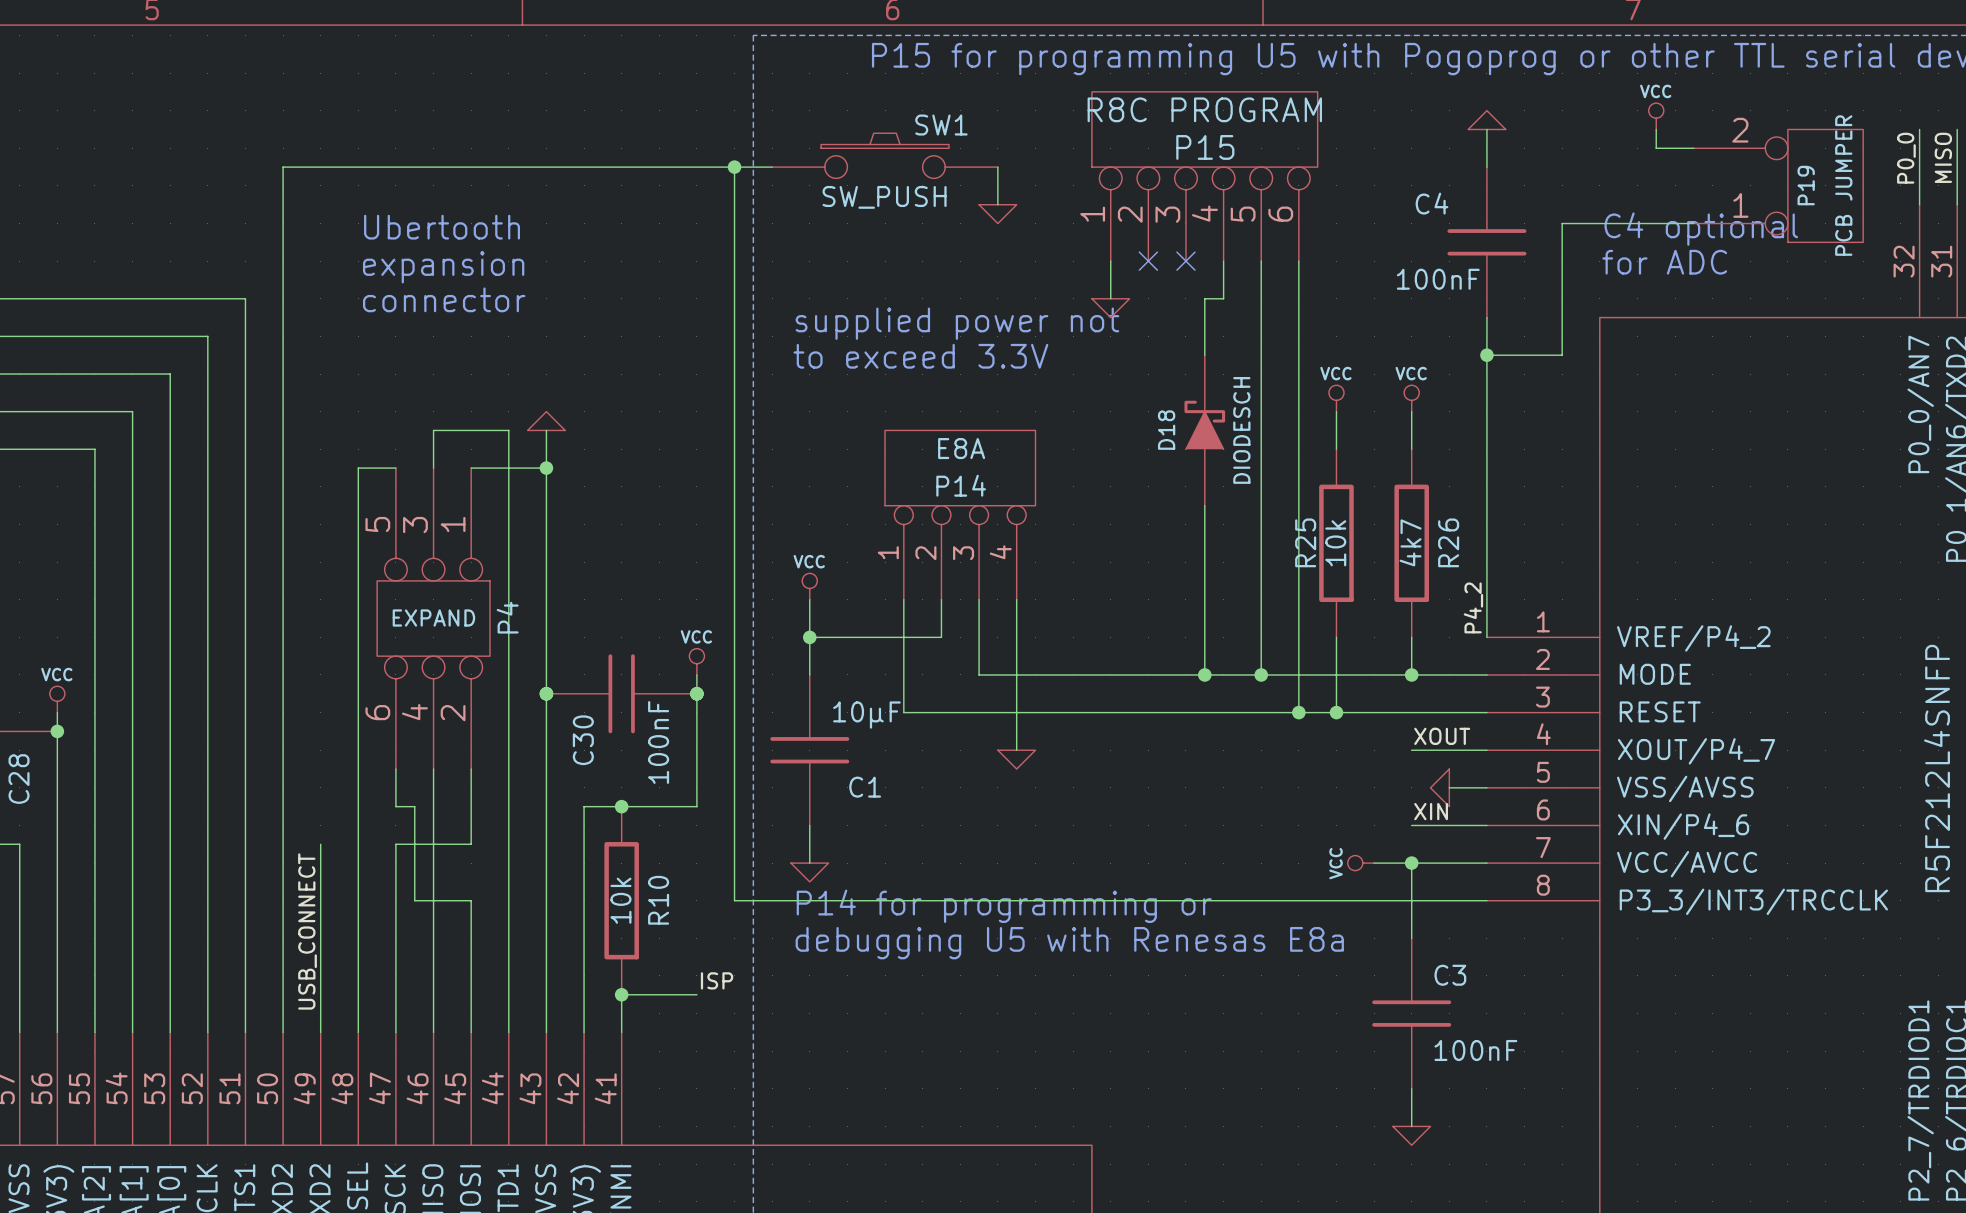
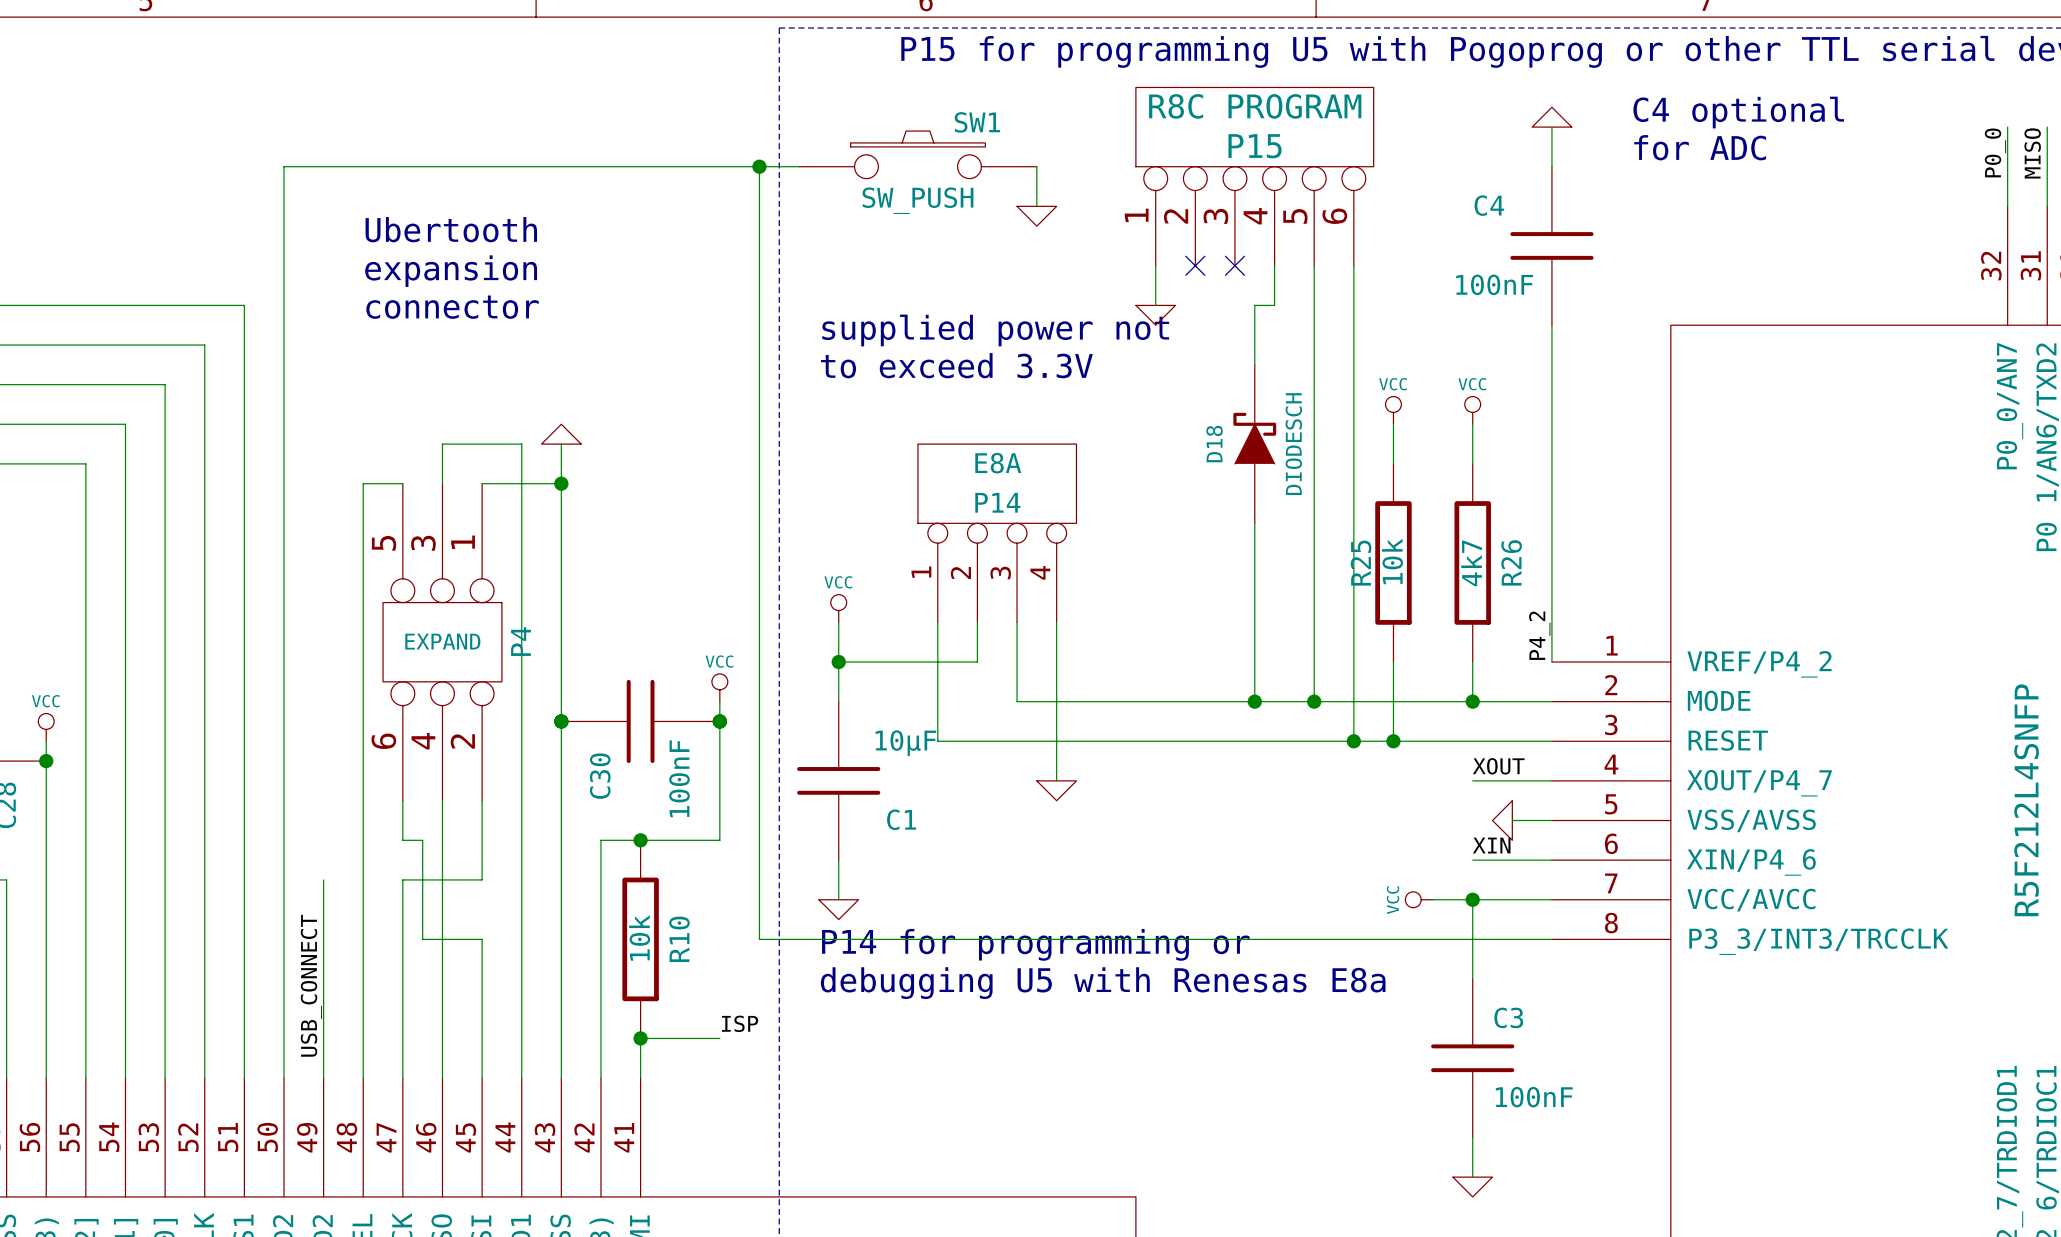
power symbol: VCC (1656, 116) -> none
wire: (1656, 129) (1656, 148) (1693, 148) -> none
P19: PCB JUMPER (1778, 185) -> none
wire: (1693, 223) (1562, 223) (1562, 355) (1486, 355) -> none
text position: C4 optional (1701, 229) -> C4 optional (1738, 112)
text position: for ADC (1664, 262) -> for ADC (1700, 147)
junction: (1486, 355) -> none

